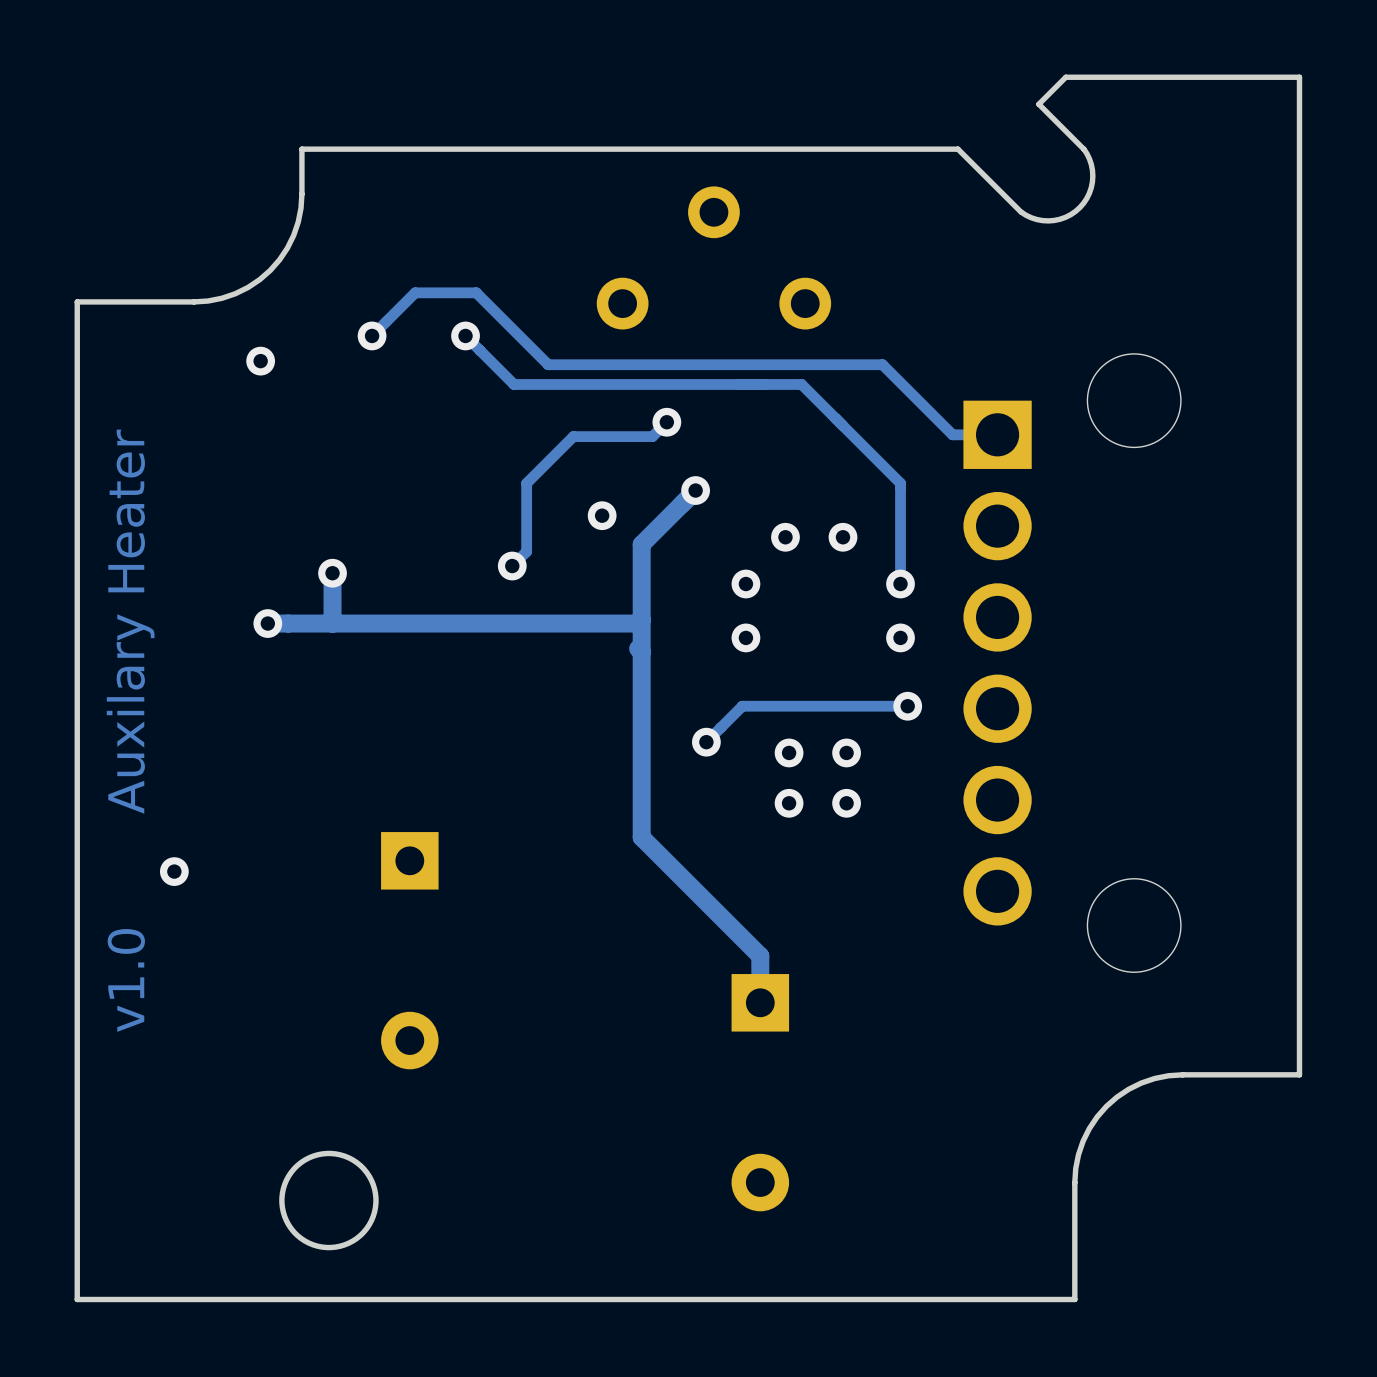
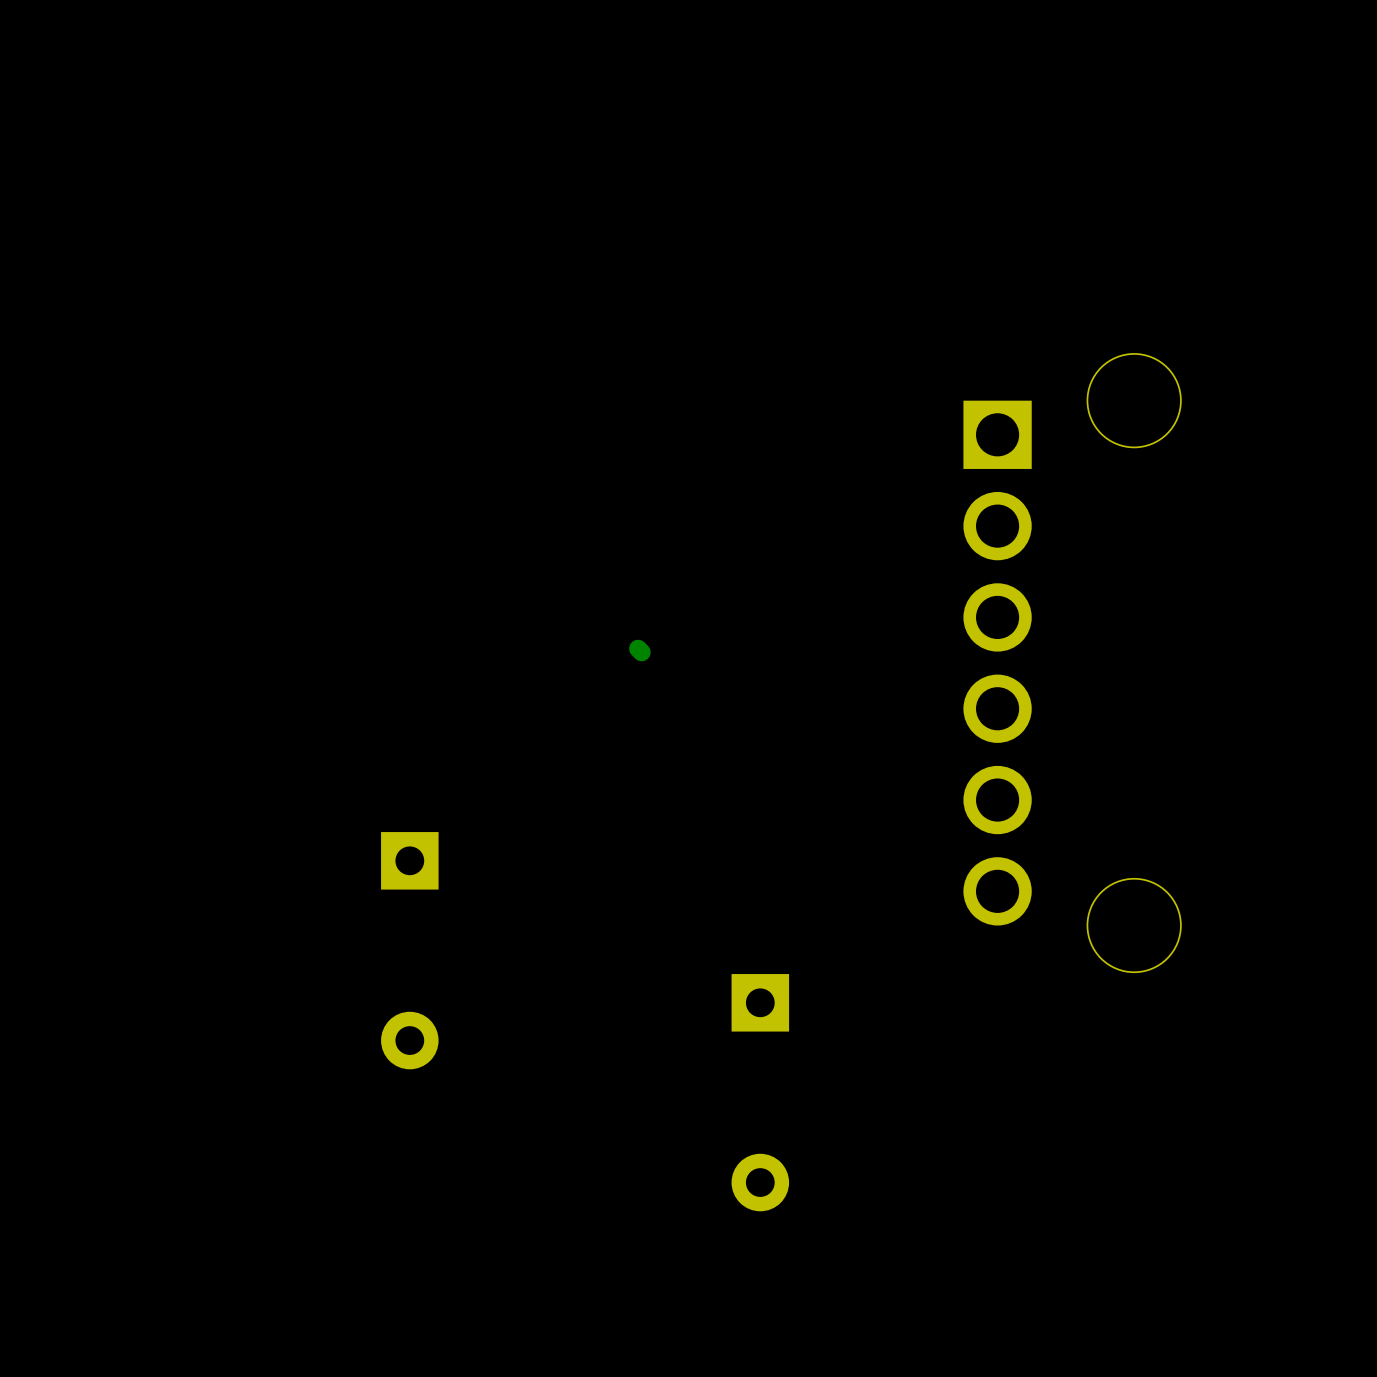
board edge: (1020, 211) (957, 149) (301, 149) (301, 194) (298, 222) (293, 235) (279, 259) (259, 279) (235, 293) (208, 301) (77, 301) (77, 1299) (1074, 1299) (1075, 1168) (1083, 1141) (1097, 1117) (1106, 1106) (1117, 1097) (1141, 1083) (1168, 1075) (1299, 1074) (1299, 77) (1065, 77) (1038, 104) (1087, 153) (1092, 170) (1091, 187) (1079, 207) (1065, 217) (1042, 220) (1021, 212) -> none
part: (713, 257) -> none
track: (372, 335) (415, 292) (476, 292) (548, 364) (882, 364) (952, 434) (997, 434) -> none
via: (372, 335) -> none
track: (465, 335) (514, 384) (801, 384) (900, 483) (900, 584) -> none
via: (465, 335) -> none
via: (260, 361) -> none
track: (666, 422) (652, 436) (573, 436) (526, 483) (526, 551) (512, 566) -> none
via: (666, 422) -> none
track: (695, 490) (641, 544) (641, 837) (760, 956) (760, 1002) -> none
via: (695, 490) -> none
via: (602, 515) -> none
via: (785, 537) -> none
via: (842, 537) -> none
via: (512, 566) -> none
track: (332, 573) (332, 623) -> none
via: (332, 573) -> none
via: (745, 584) -> none
via: (900, 584) -> none
track: (641, 619) (638, 623) (267, 623) -> none
text: Auxilary Heater (130, 621) -> none
via: (267, 623) -> none
via: (745, 637) -> none
via: (900, 637) -> none
track: (907, 706) (742, 706) (706, 742) -> none
via: (907, 706) -> none
via: (706, 742) -> none
via: (789, 752) -> none
via: (846, 752) -> none
via: (789, 803) -> none
via: (846, 803) -> none
via: (174, 871) -> none
text: v1.0 (126, 980) -> none
round board edge: [279, 1150, 379, 1251] -> none

